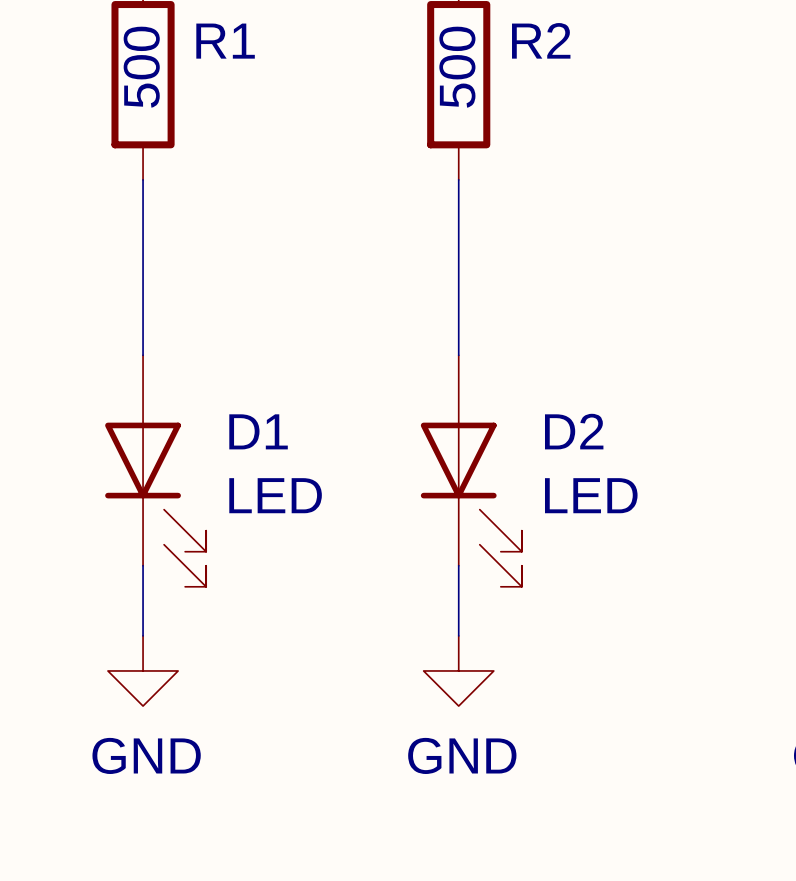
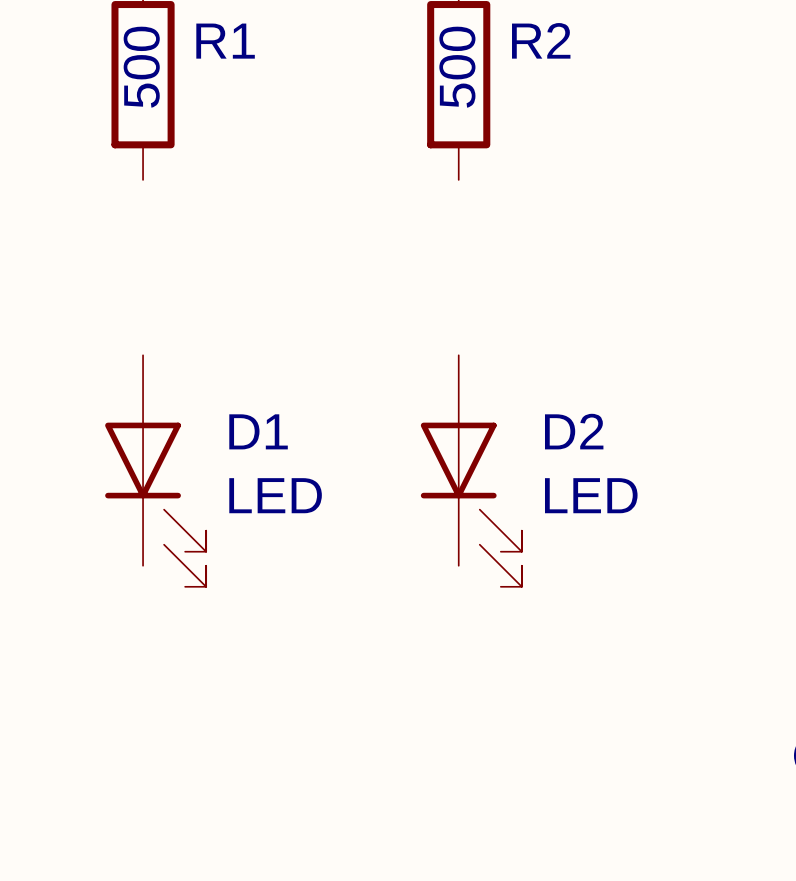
wire: (143, 179) (143, 355) -> none
wire: (458, 179) (458, 355) -> none
wire: (143, 565) (143, 635) -> none
wire: (458, 565) (458, 635) -> none
power symbol: GND (143, 670) -> none
power symbol: GND (458, 670) -> none

